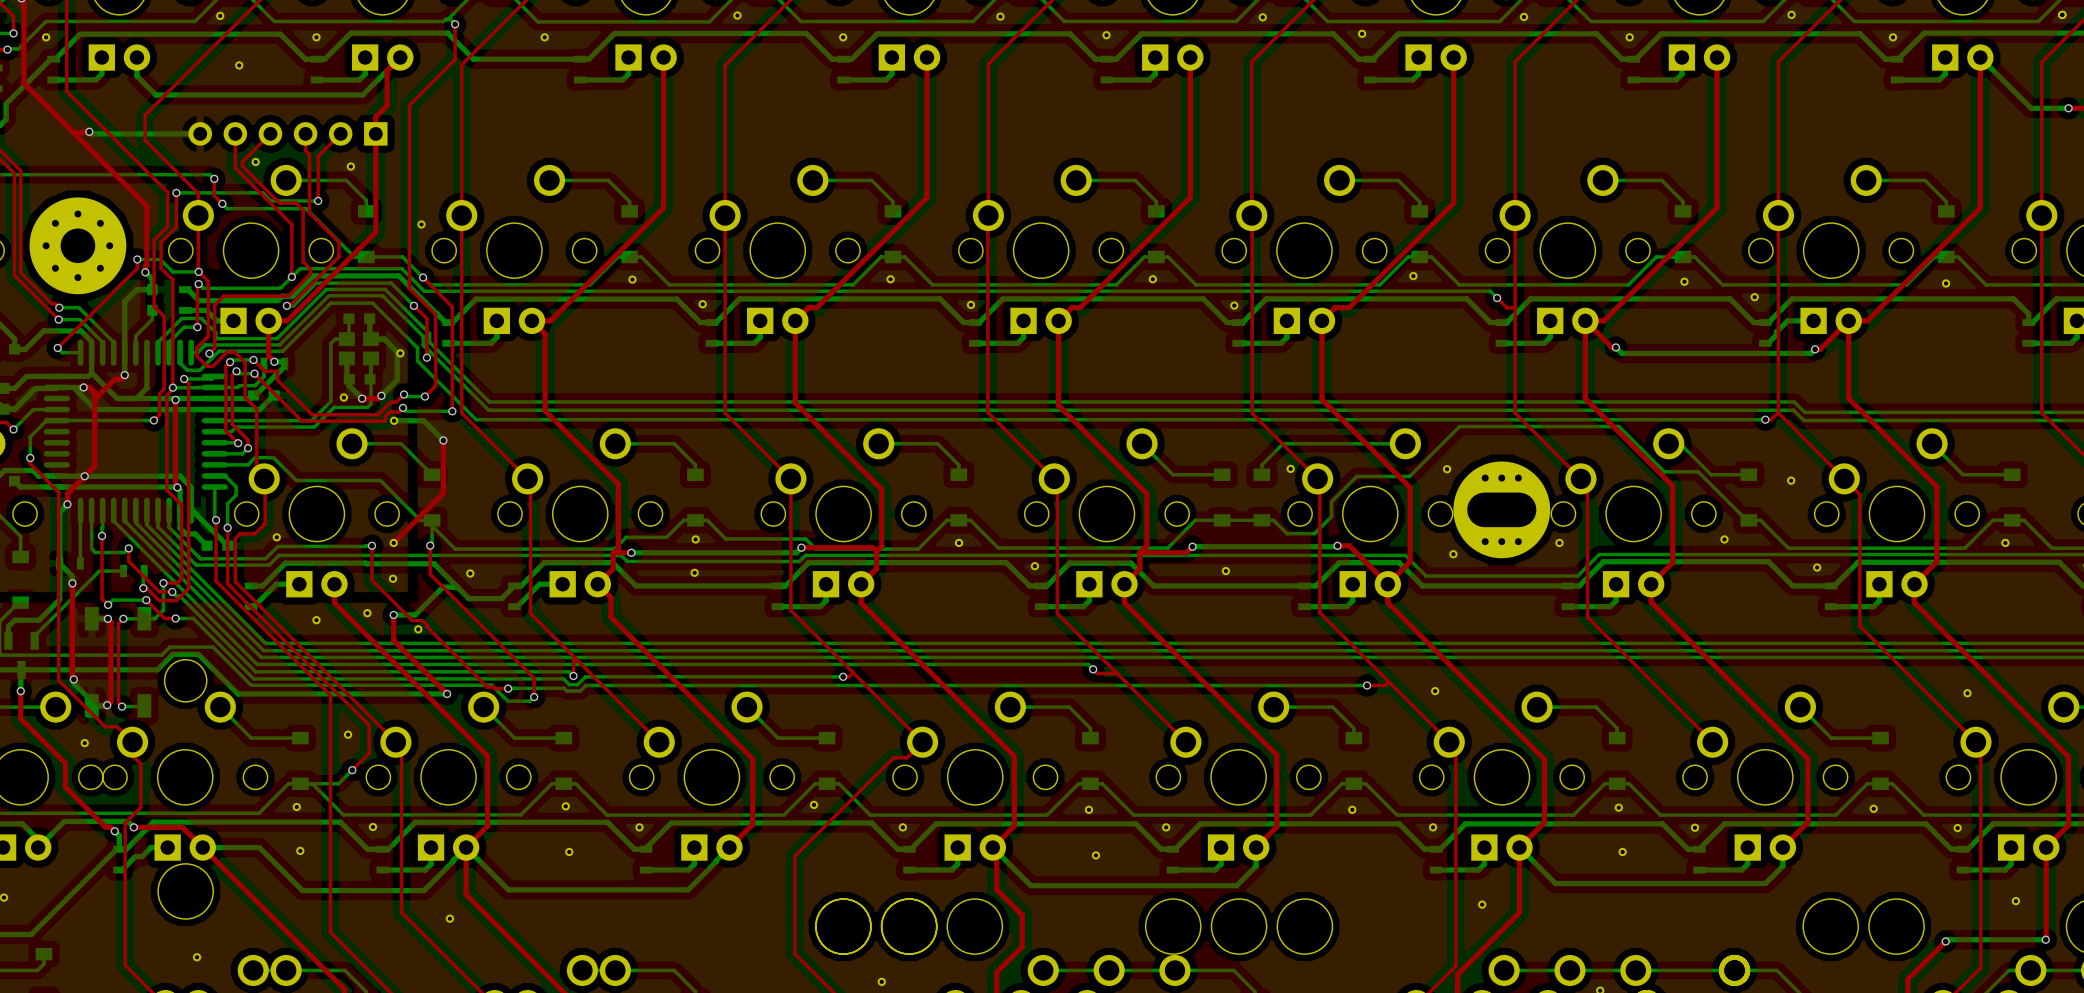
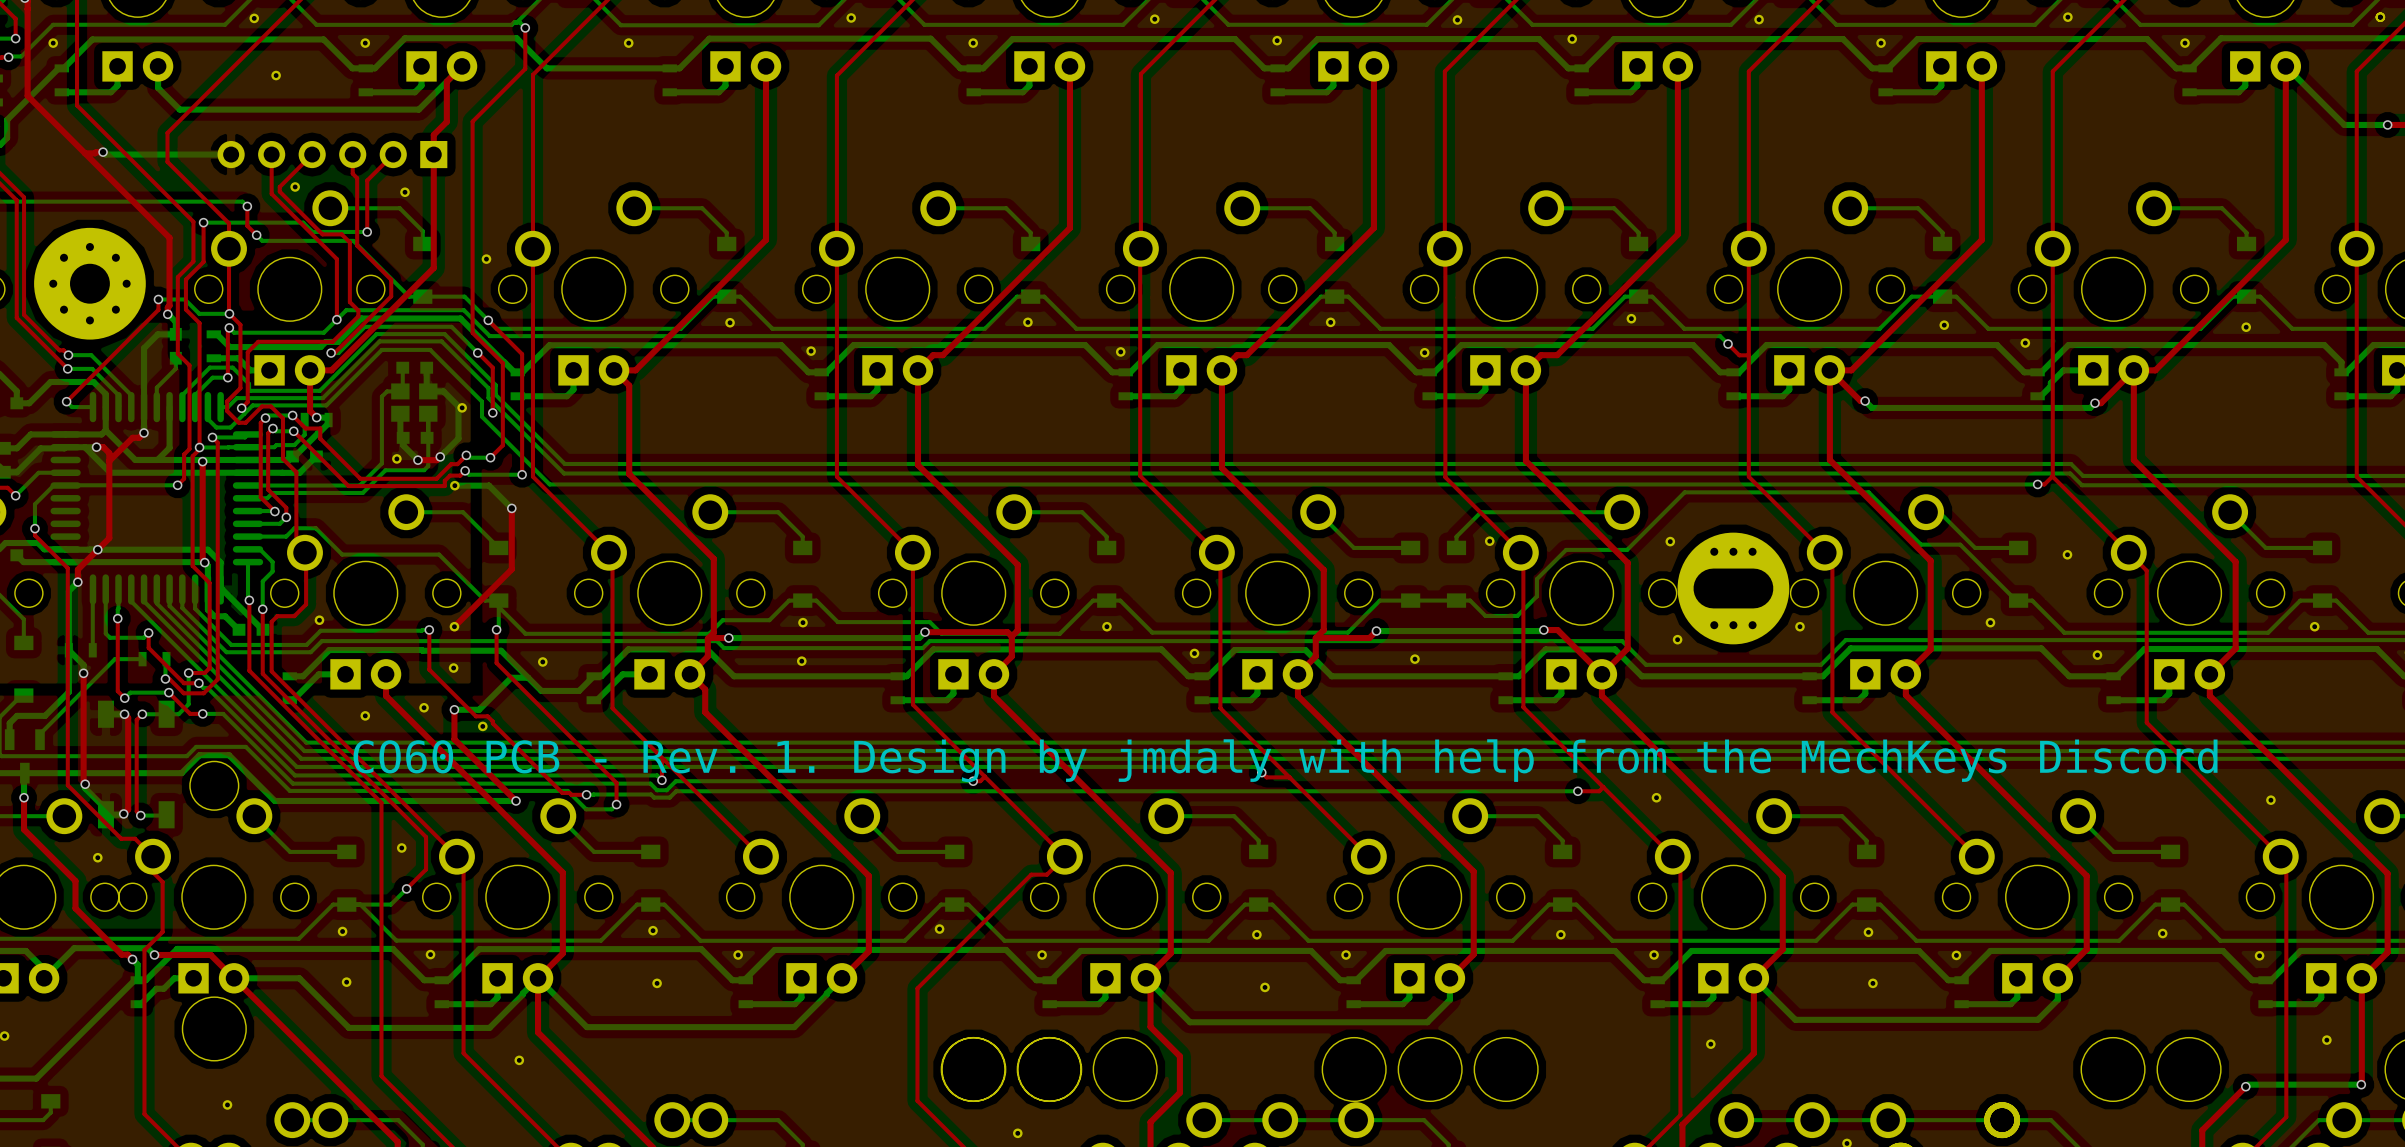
text: none -> CO60 PCB - Rev. 1. Design by jmdaly with help from the MechKeys Discord (1285, 760)

